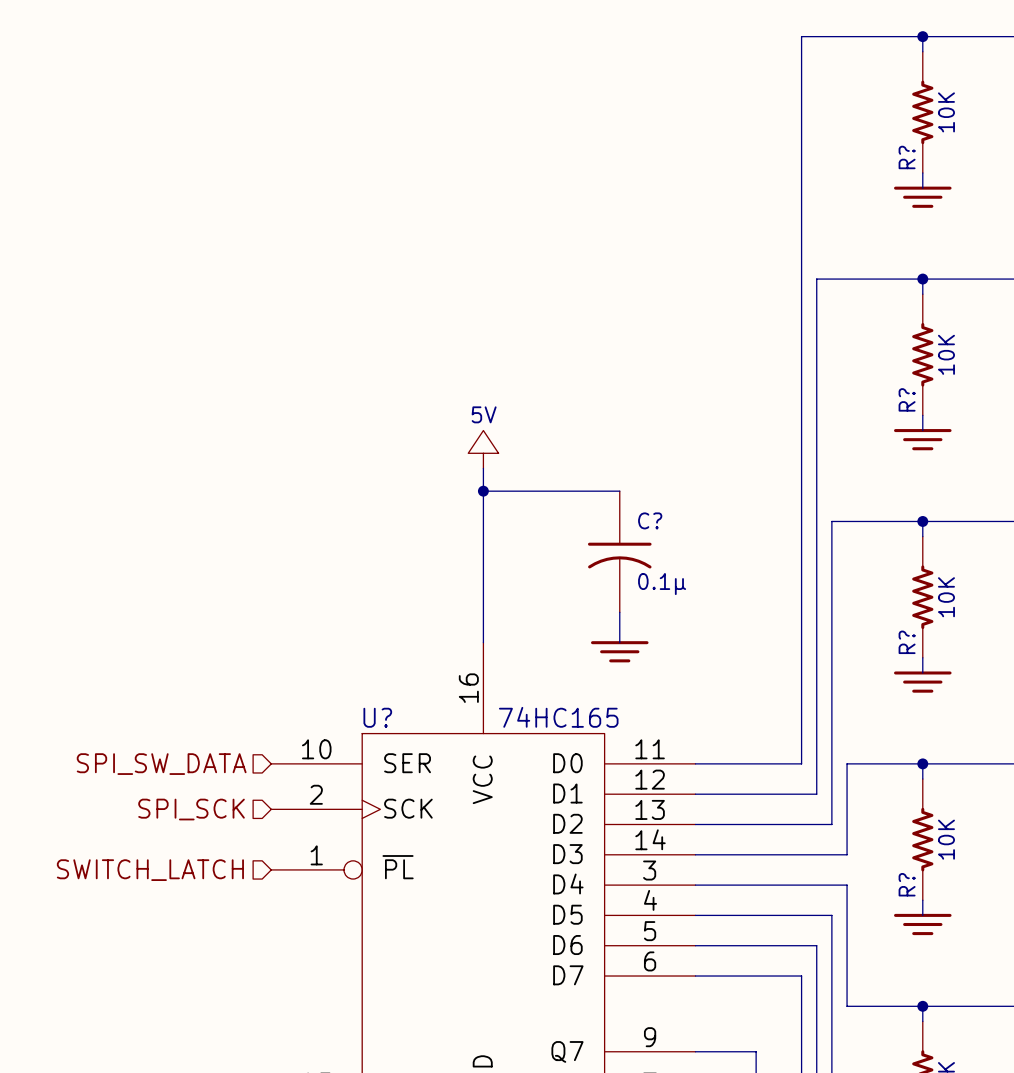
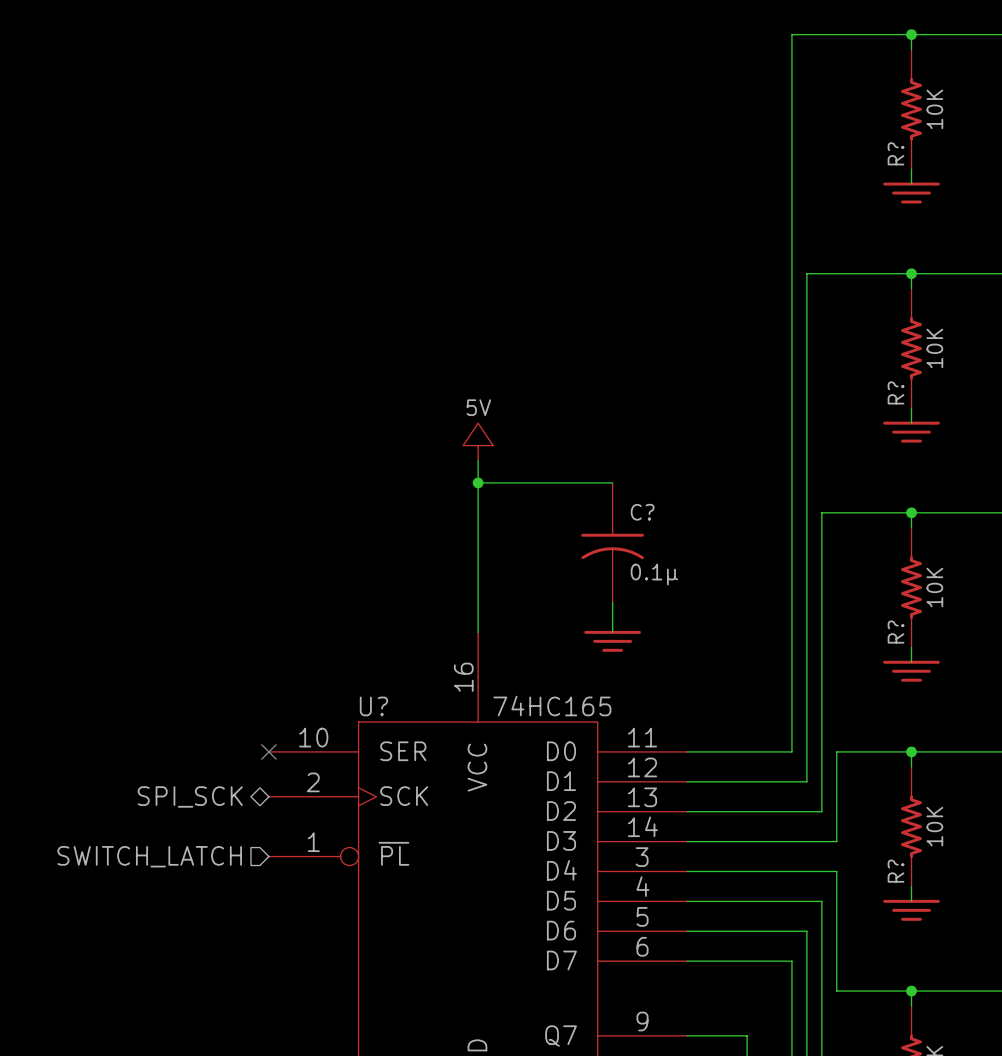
no-connect mark: none -> (268, 751)
hierarchical label: SPI_SW_DATA (161, 764) -> none
hierarchical label shape: input (191, 809) -> bidirectional (190, 796)

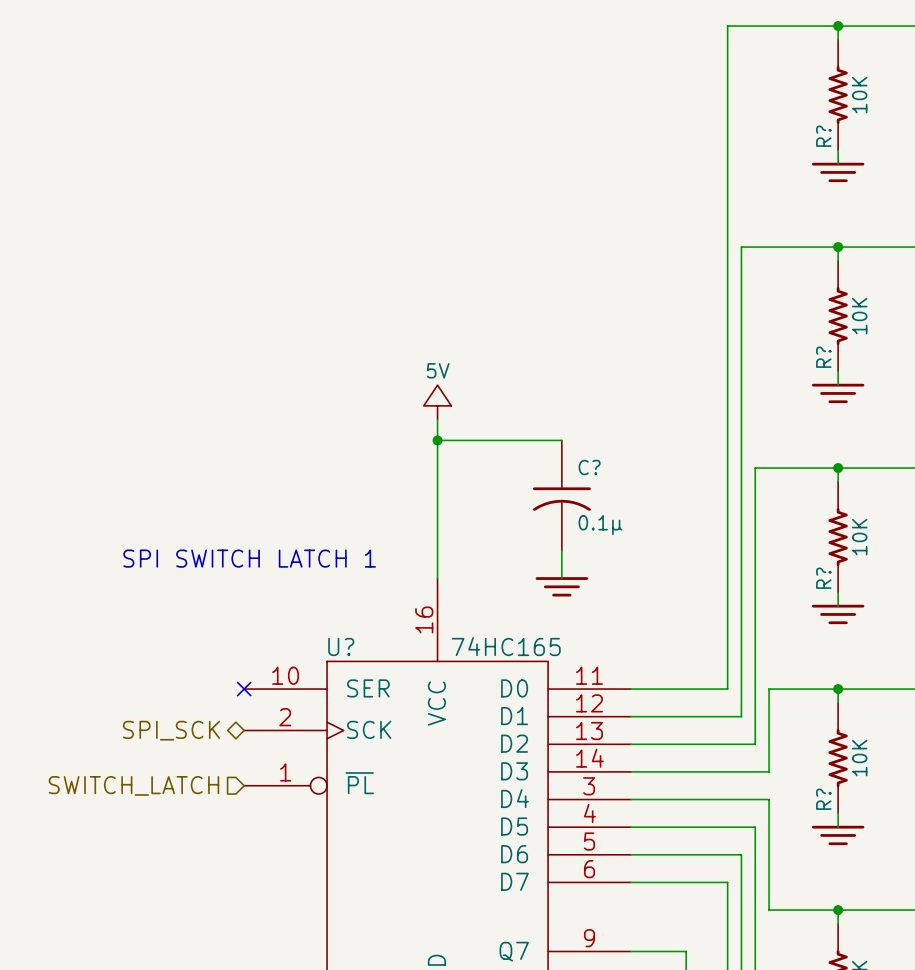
text: none -> SPI SWITCH LATCH 1 (249, 558)

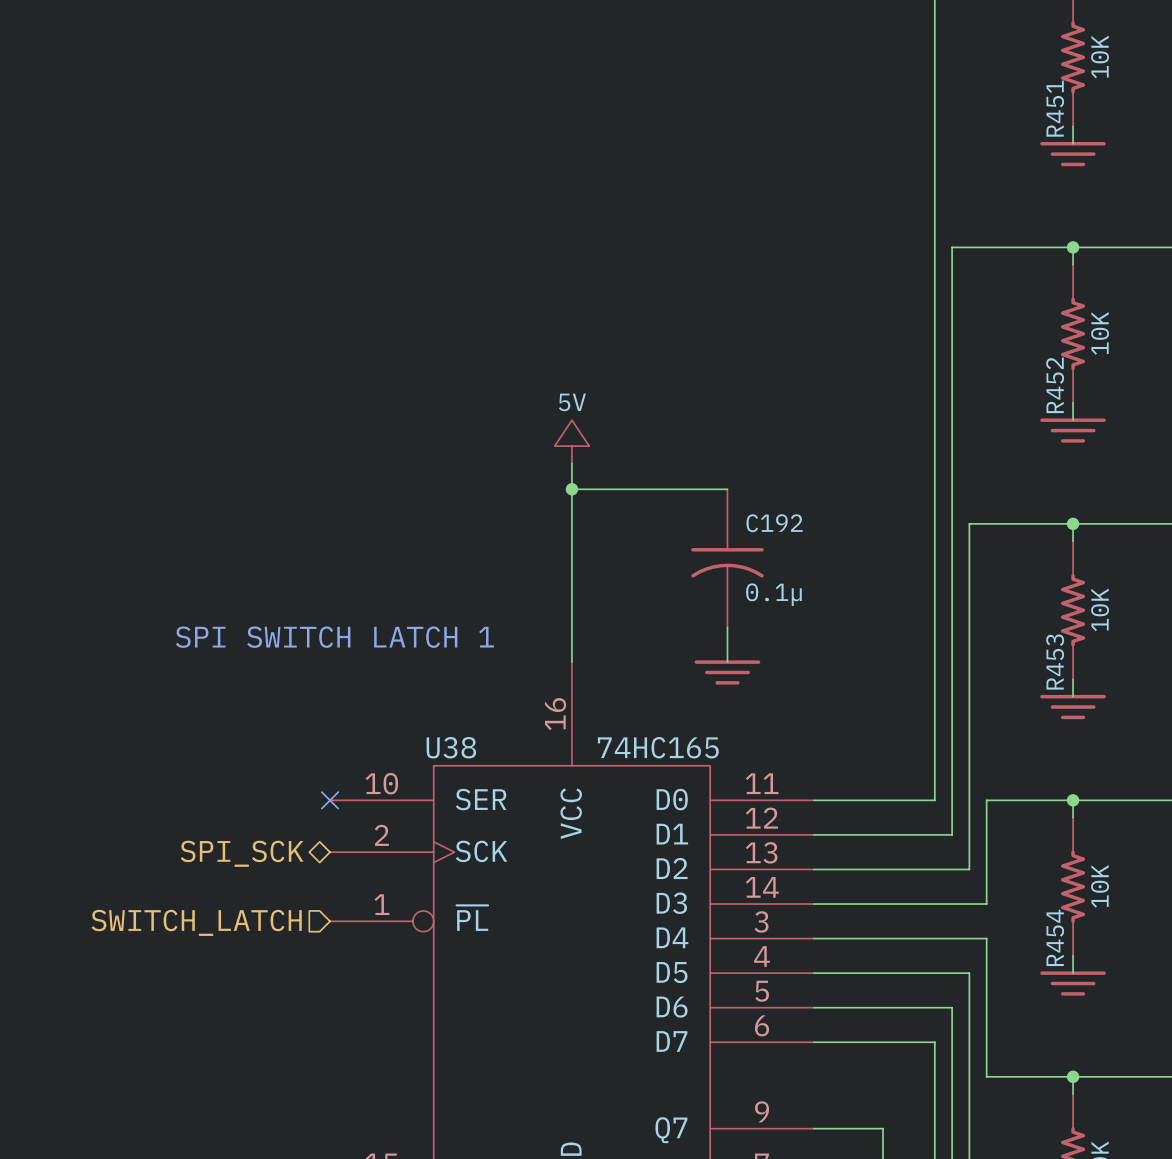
R? name: R? (823, 136) -> R451 (1055, 108)
R? name: R? (823, 357) -> R452 (1055, 385)
C? name: C? (589, 467) -> C192 (774, 523)
R? name: R? (823, 578) -> R453 (1055, 662)
U? name: U? (341, 646) -> U38 (451, 747)
R? name: R? (823, 799) -> R454 (1055, 937)

